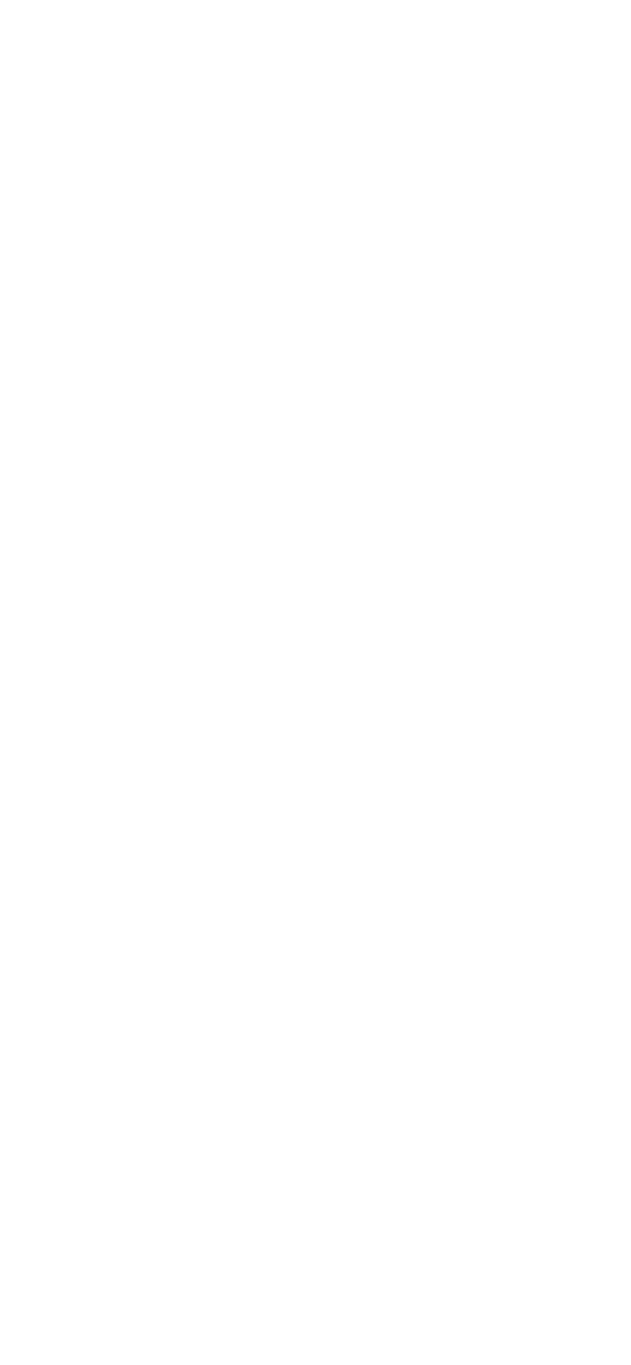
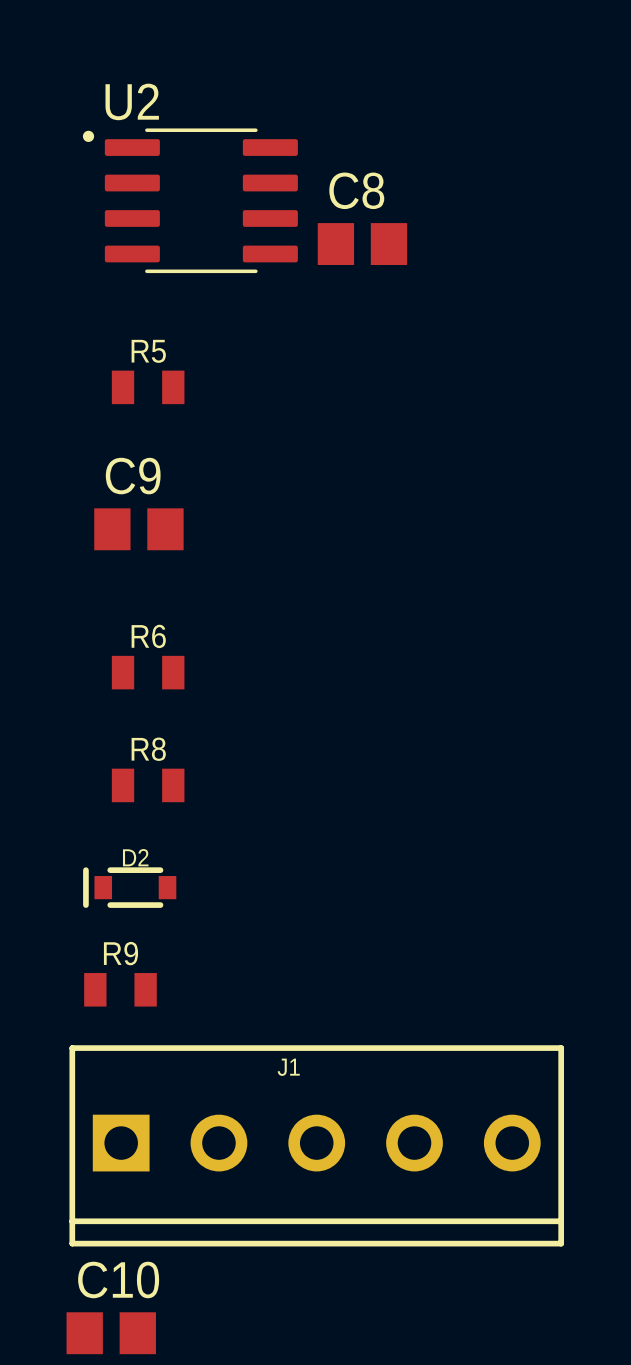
U2: none -> (190, 200)
C8: none -> (362, 244)
R5: none -> (148, 387)
C9: none -> (138, 529)
R6: none -> (148, 672)
R8: none -> (148, 785)
D2: none -> (129, 887)
R9: none -> (120, 989)
J1: none -> (316, 1145)
C10: none -> (111, 1333)

